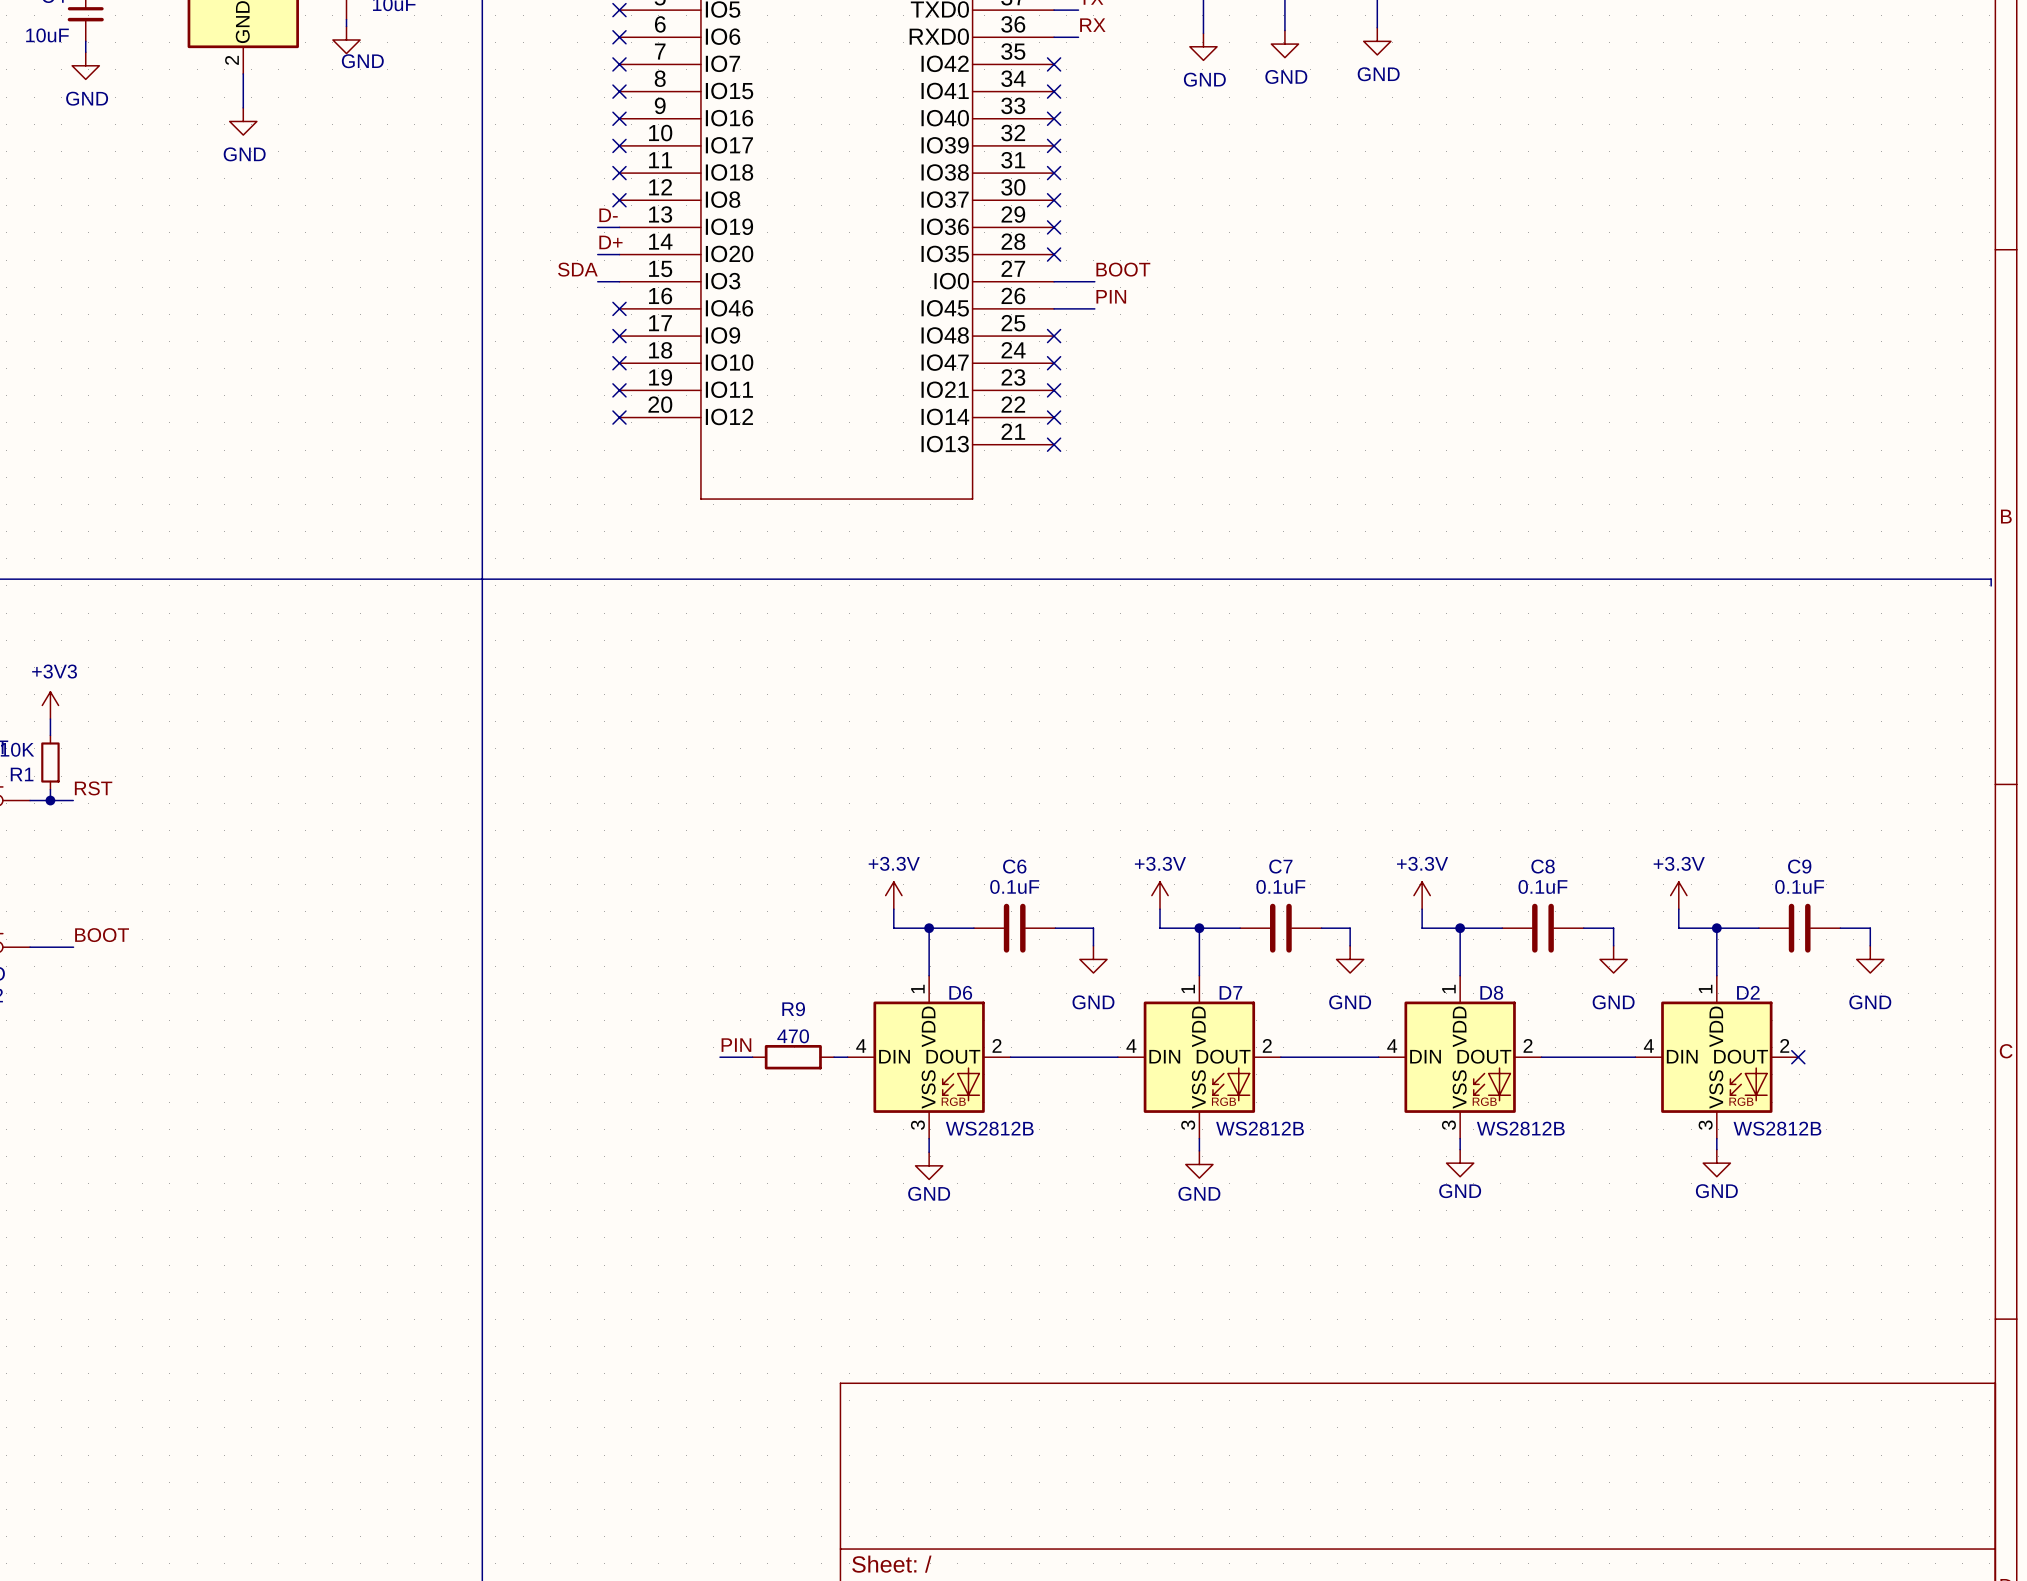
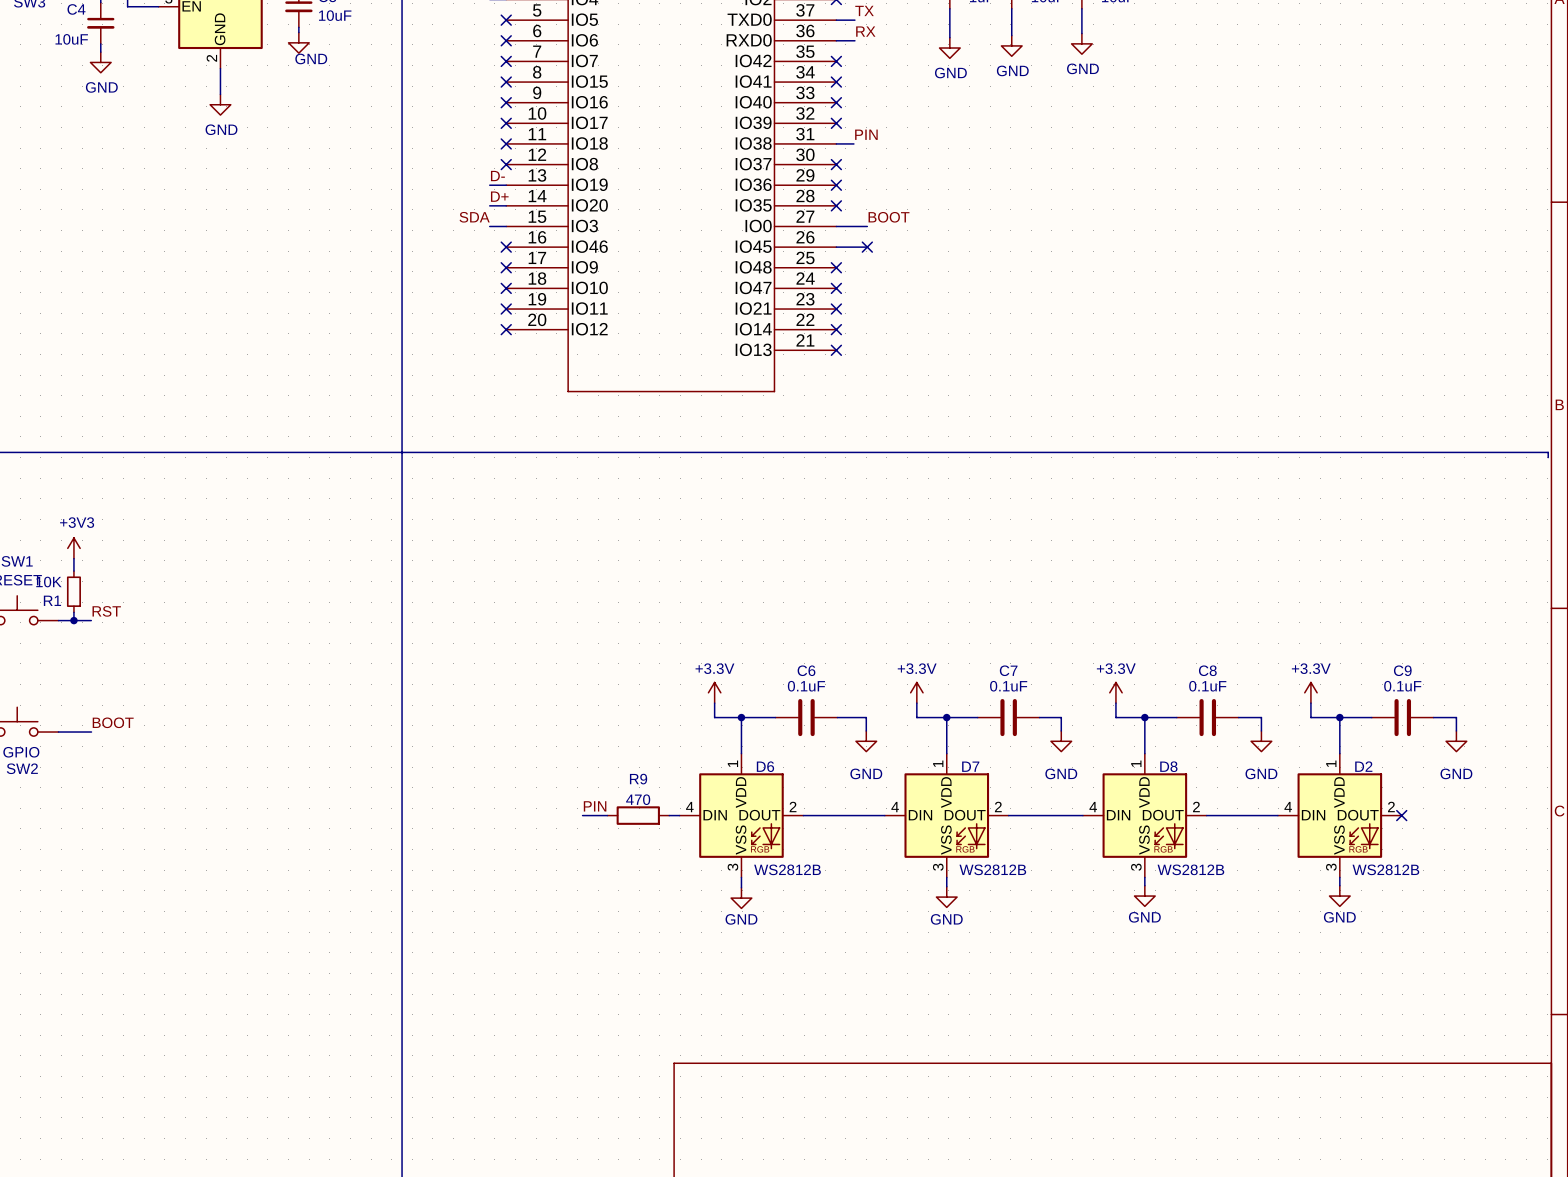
wire: none -> (836, 143) (853, 143)
no-connect mark: (1054, 173) -> none
label position: PIN (1111, 296) -> PIN (866, 134)
no-connect mark: none -> (867, 247)

